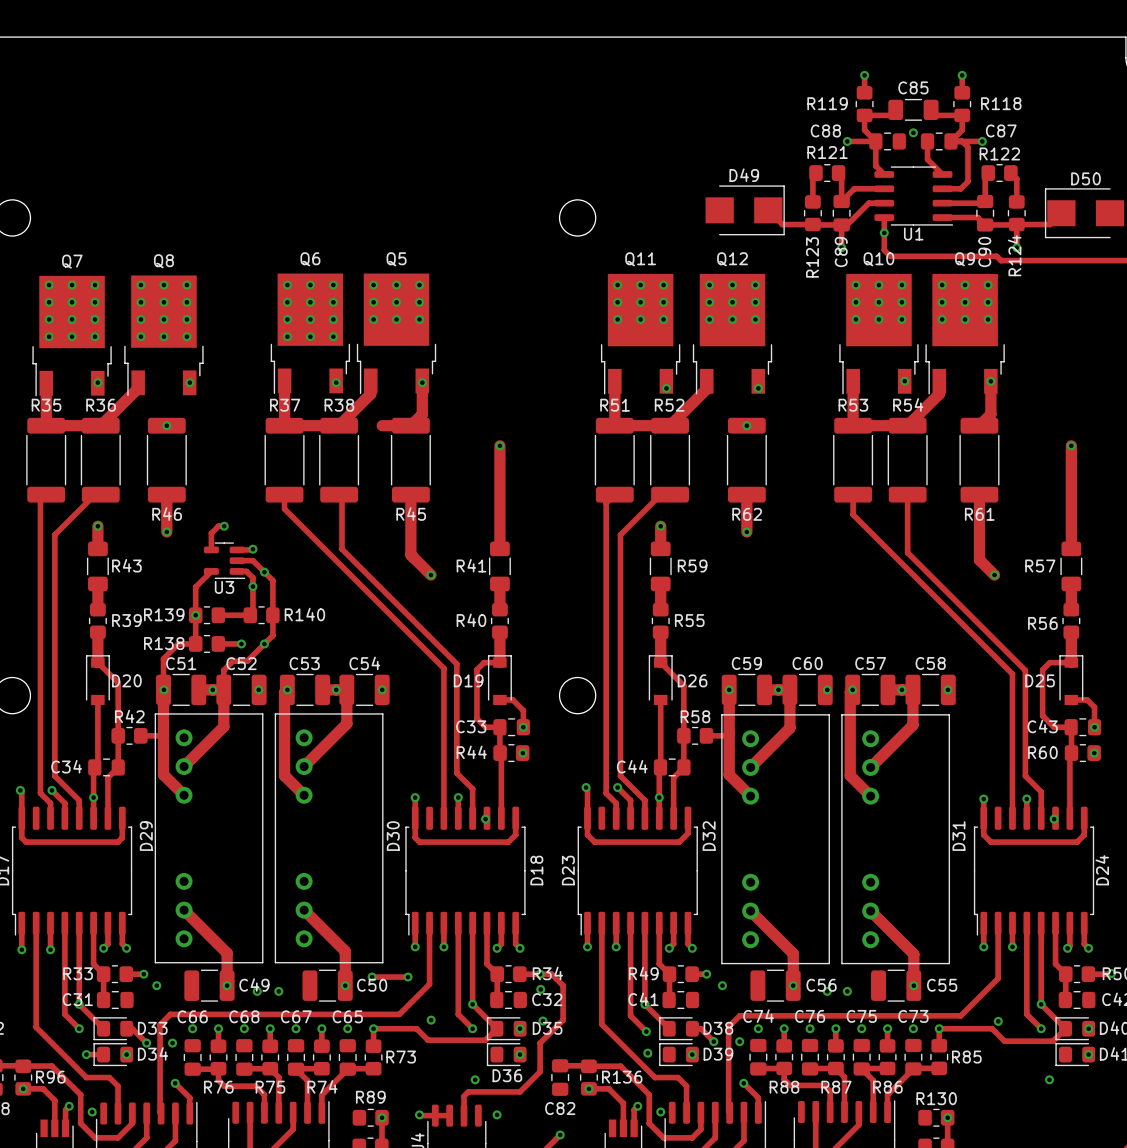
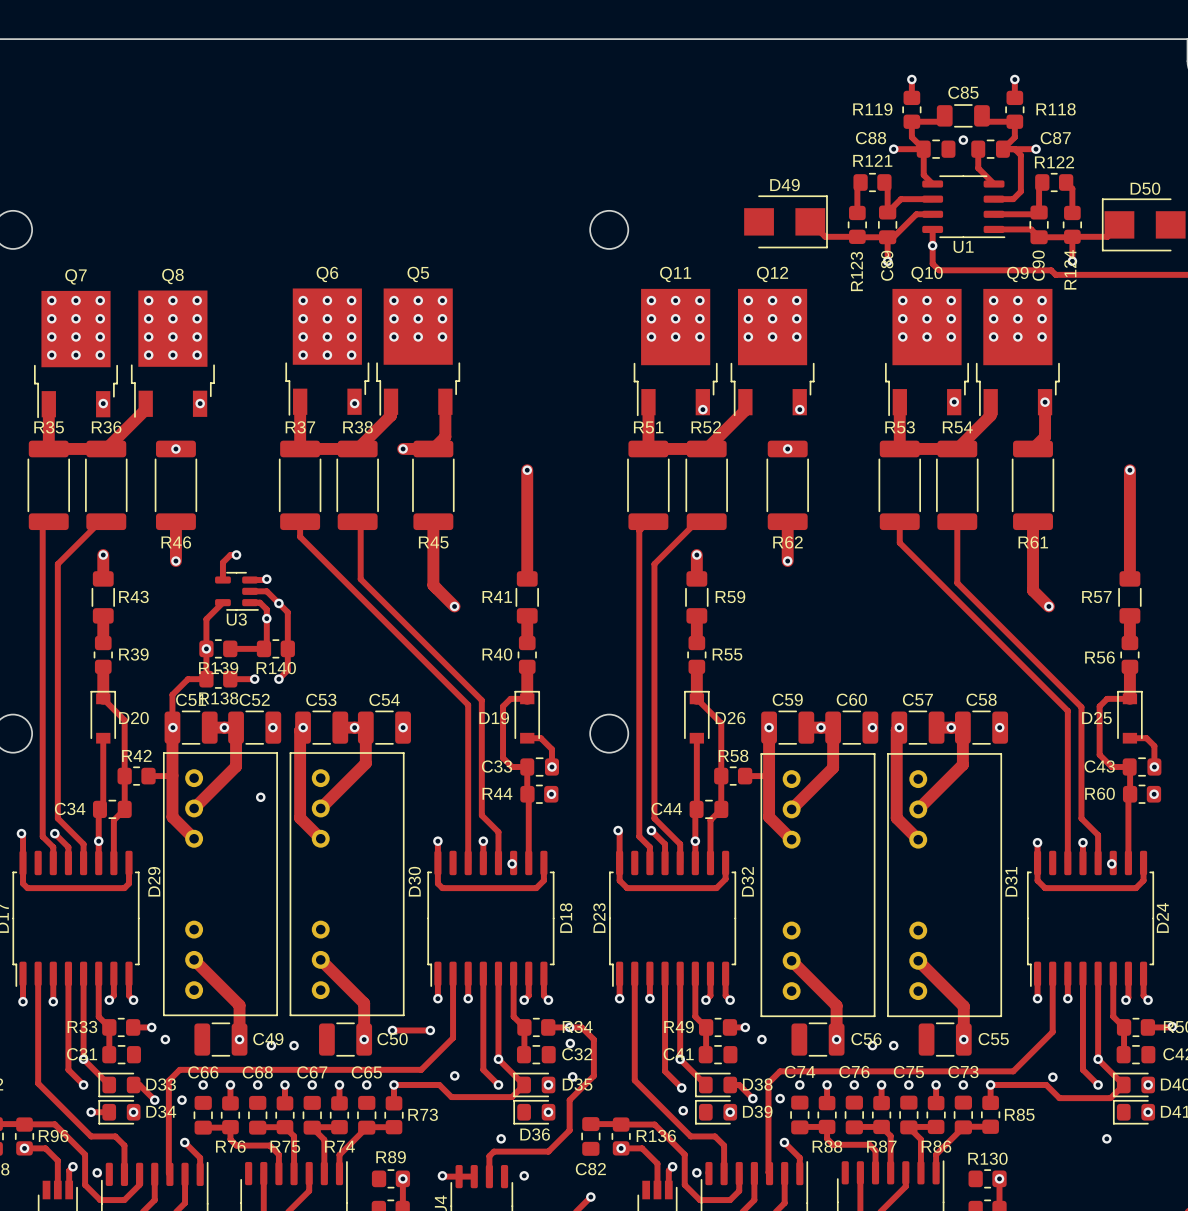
via position: (422, 382) -> (403, 448)
R139 name position: R139 (164, 614) -> R139 (218, 668)
R140 name position: R140 (304, 614) -> R140 (276, 668)
R138 name position: R138 (164, 643) -> R138 (218, 698)
track: (264, 643) (247, 661) (232, 661) (223, 670) (223, 689) -> none
via: none -> (260, 797)

